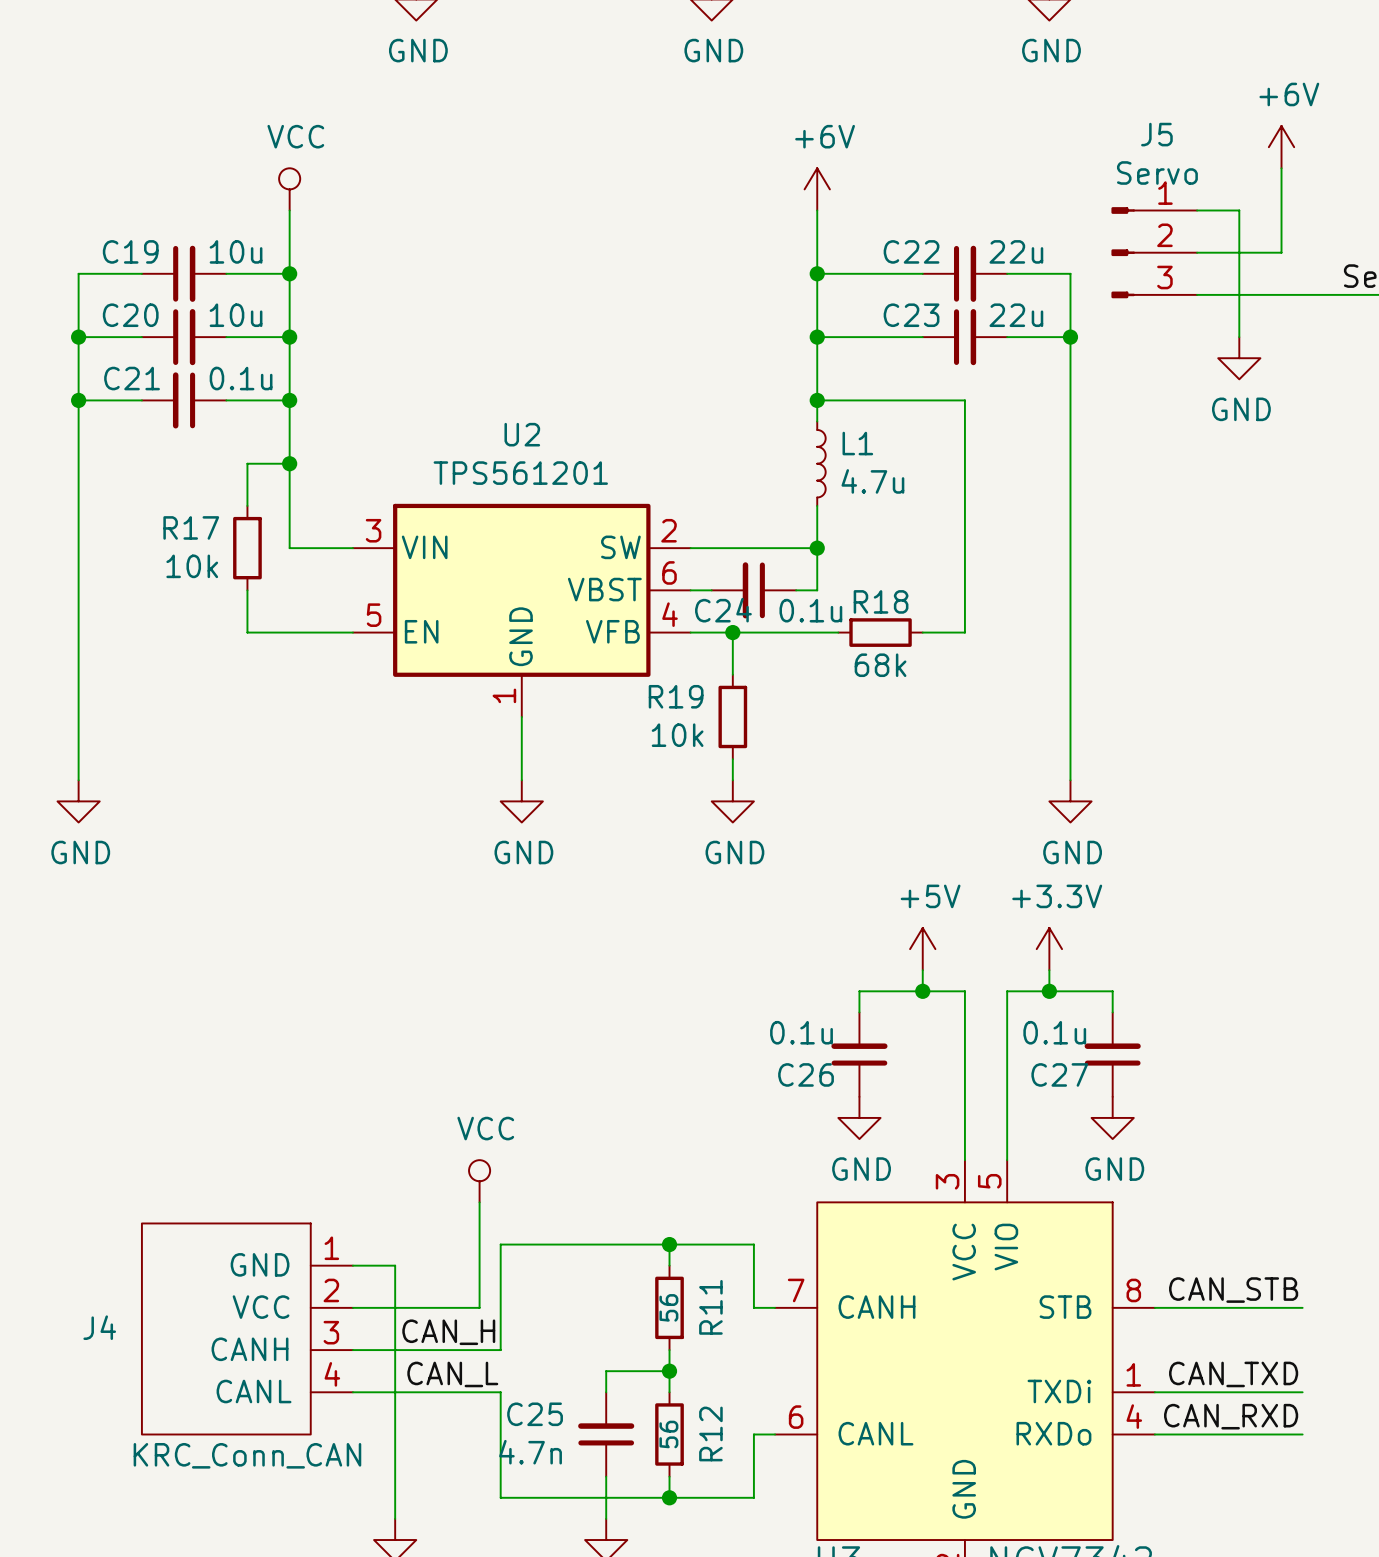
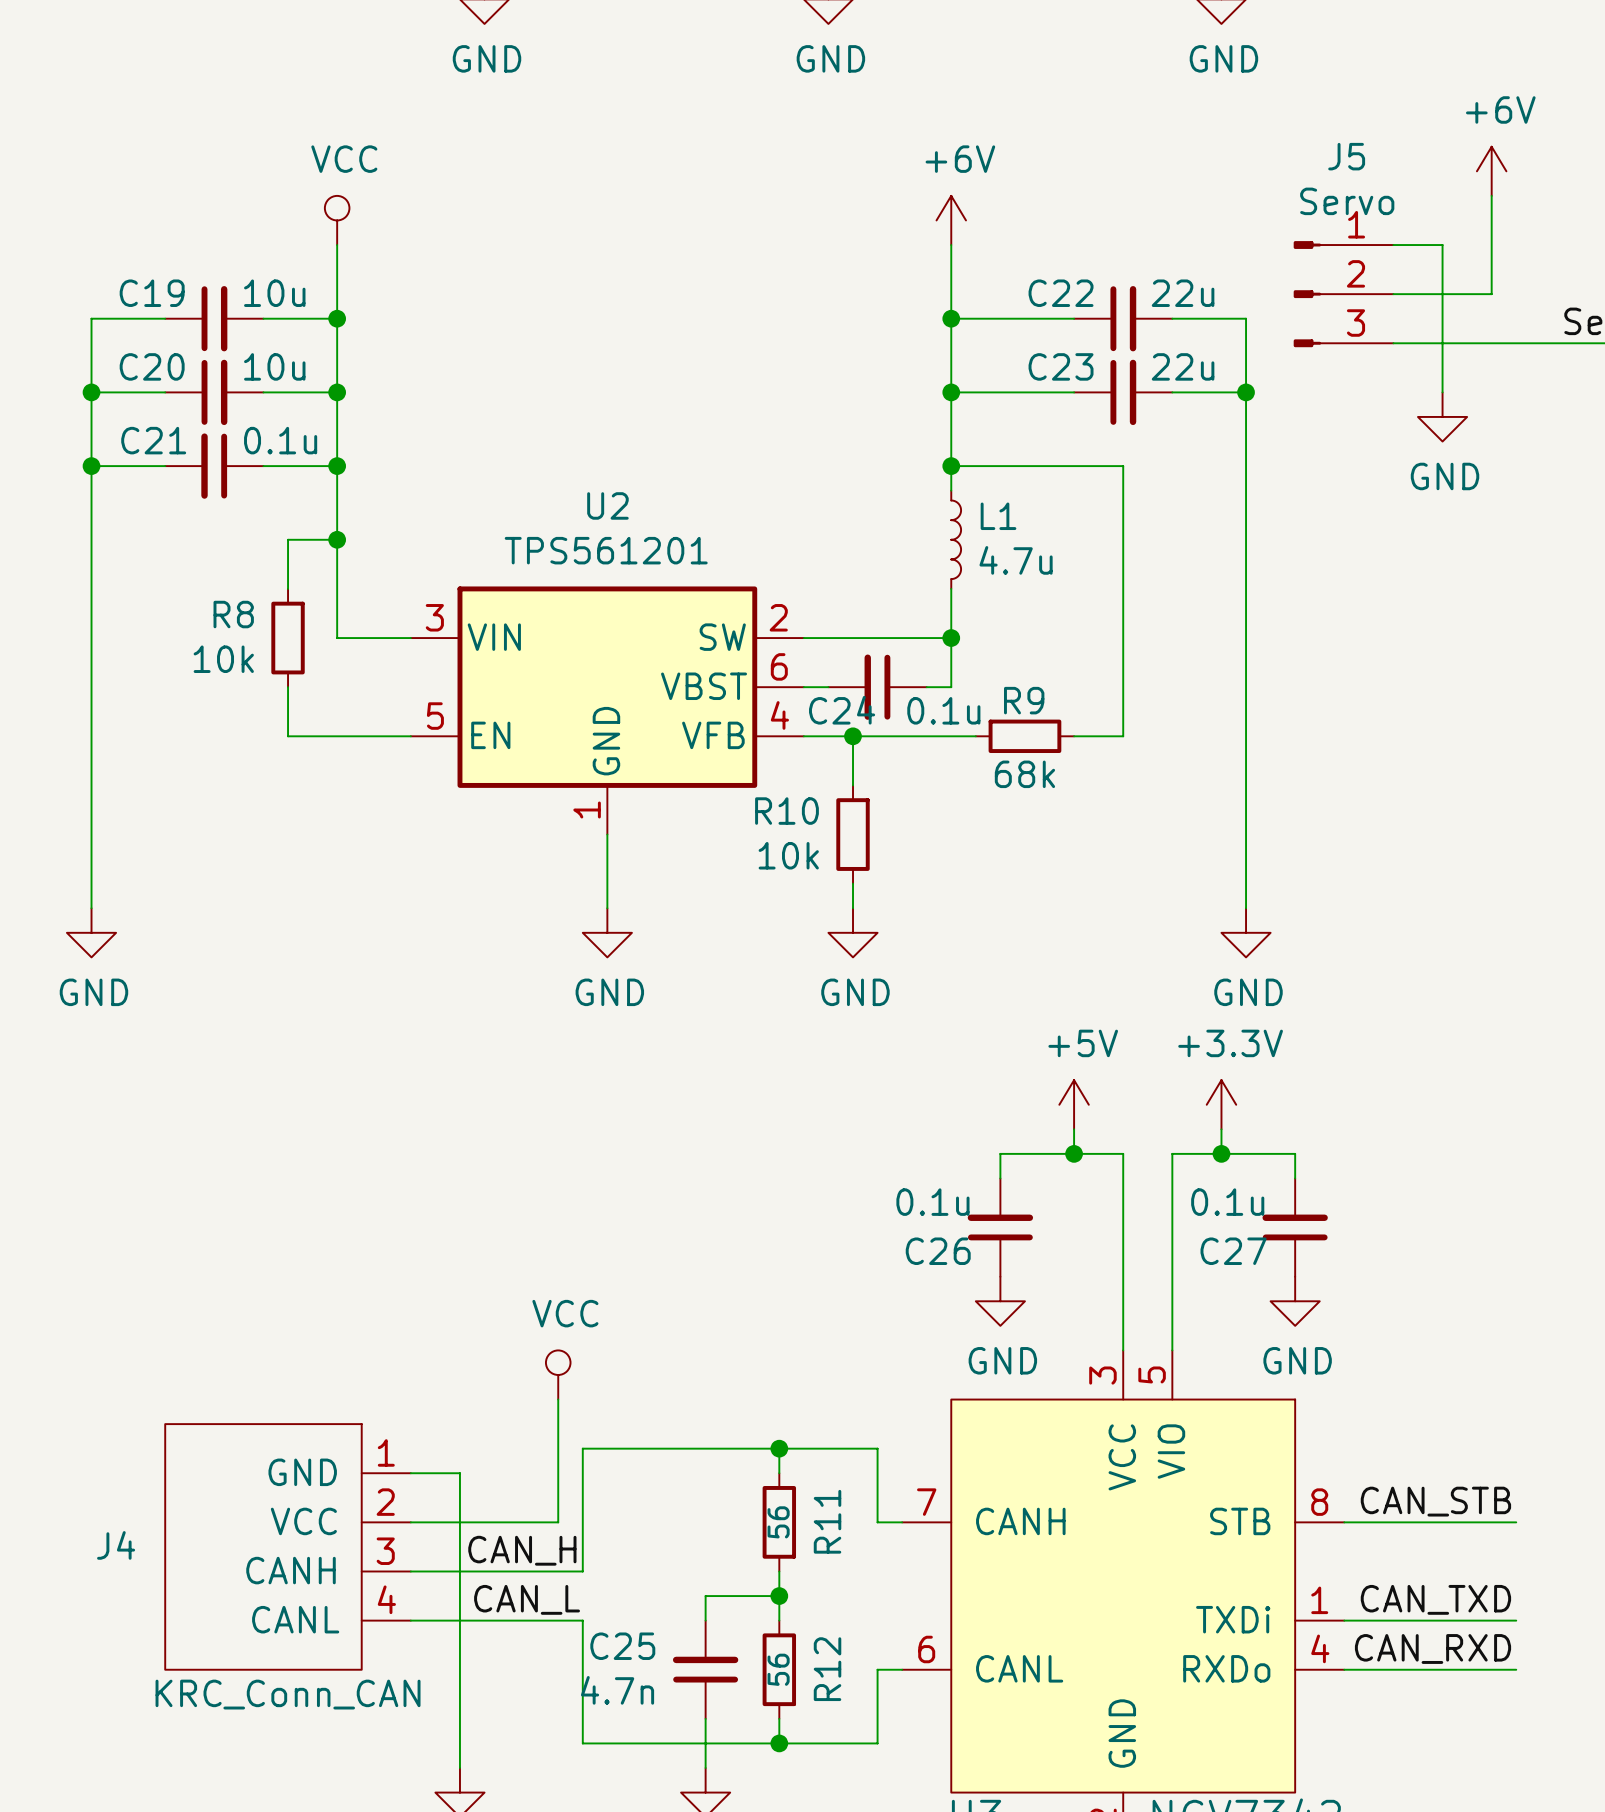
R17 name: R17 (191, 527) -> R8 (233, 614)
R18 name: R18 (881, 601) -> R9 (1024, 700)
R19 name: R19 (676, 696) -> R10 (786, 811)

